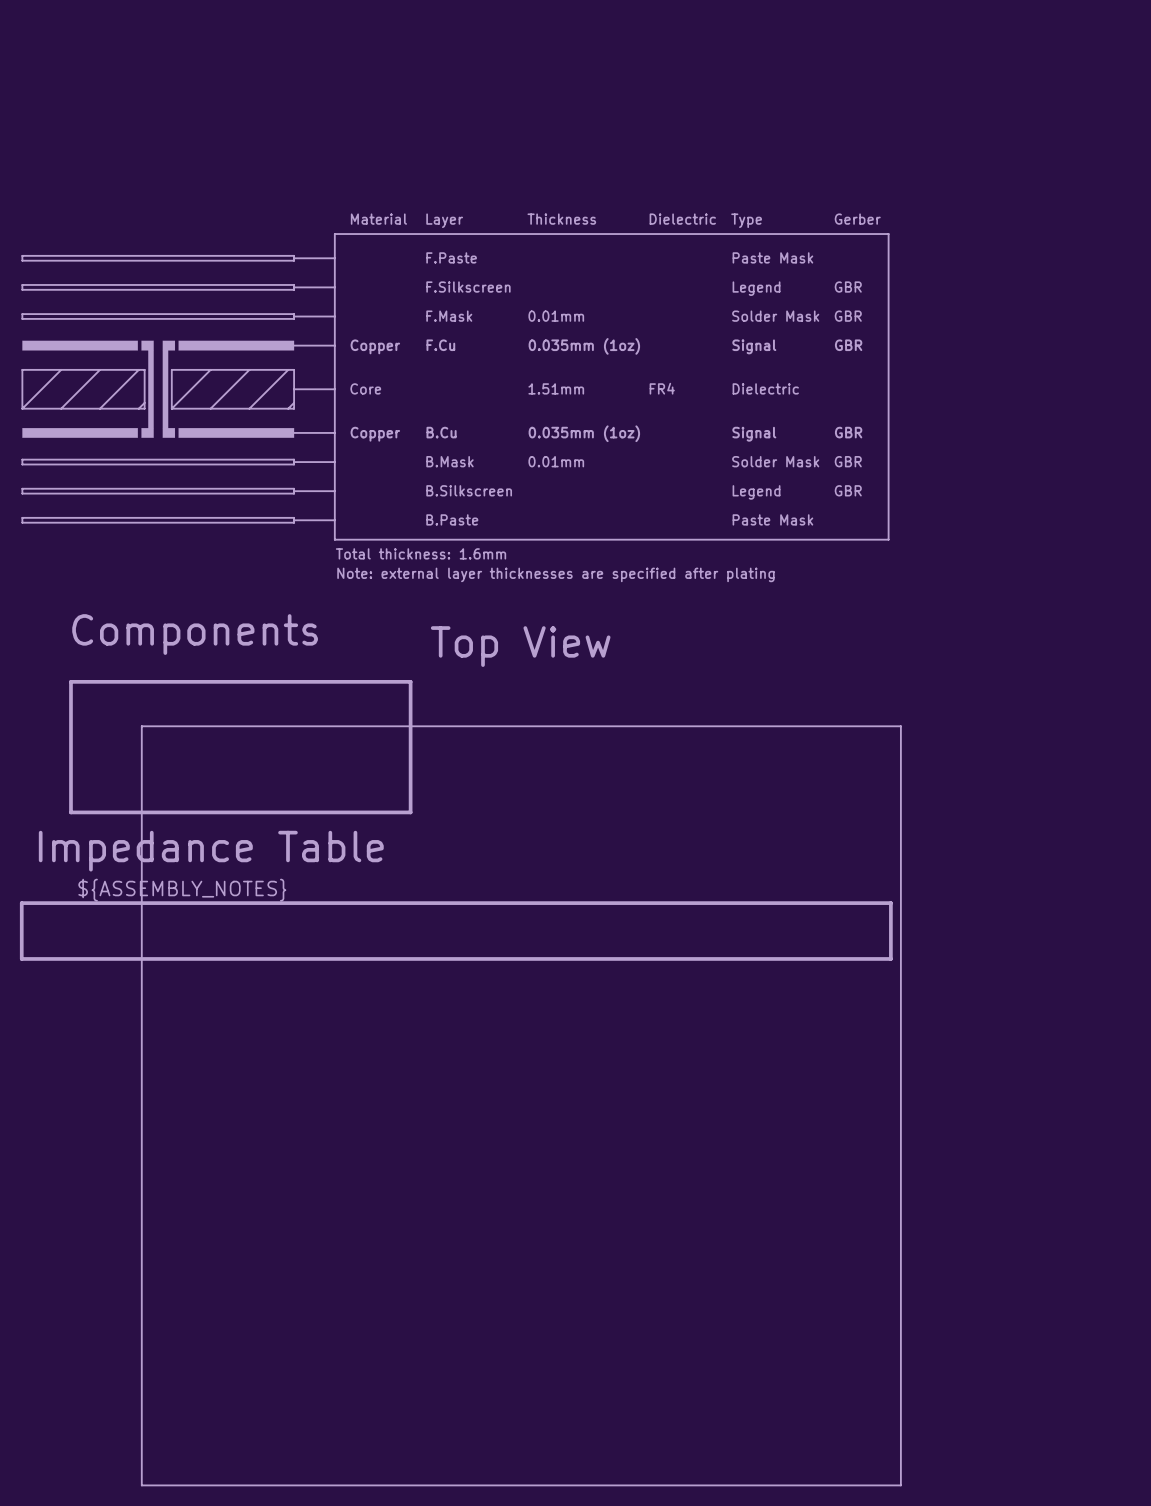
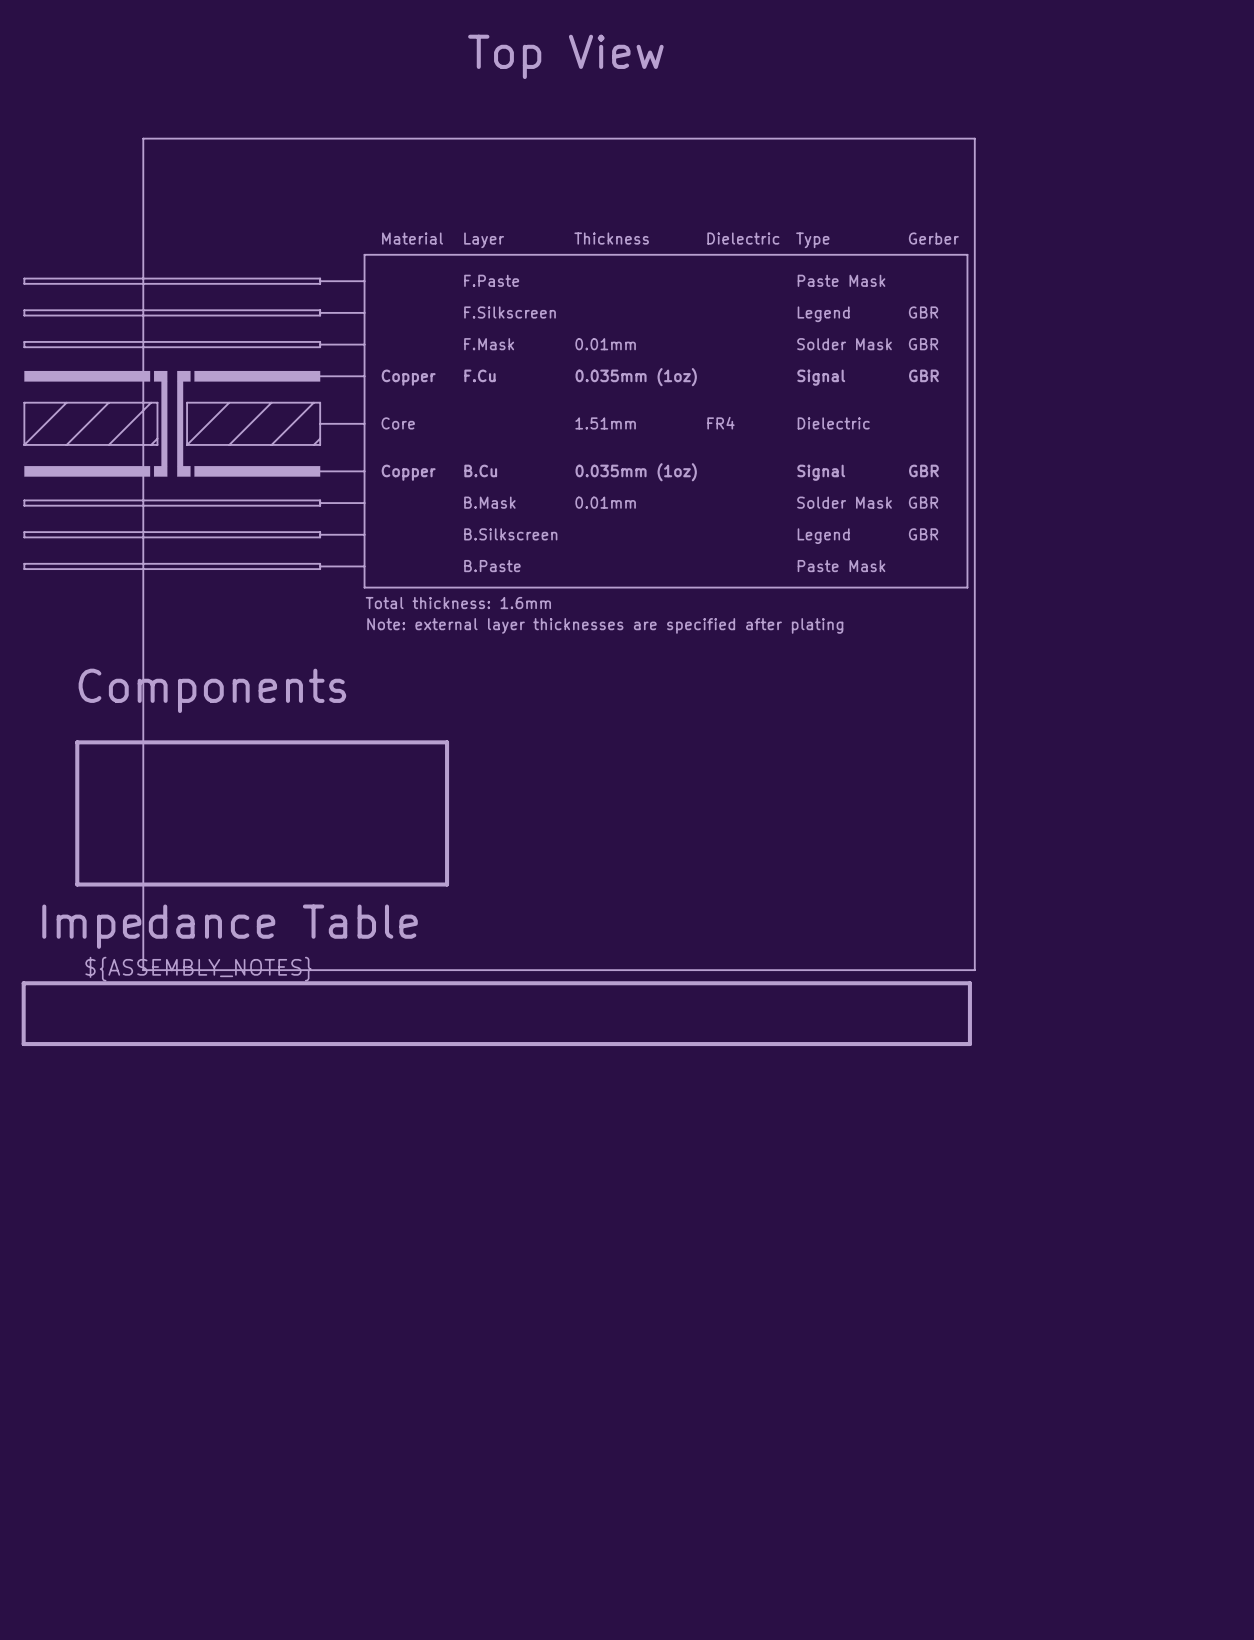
text: none -> Top View (565, 56)
line: none -> (143, 138) (974, 138) (974, 970) (143, 970) (143, 138)
text: Top View (520, 646) -> none
line: (141, 726) (900, 726) (900, 1485) (141, 1485) (141, 726) -> none

